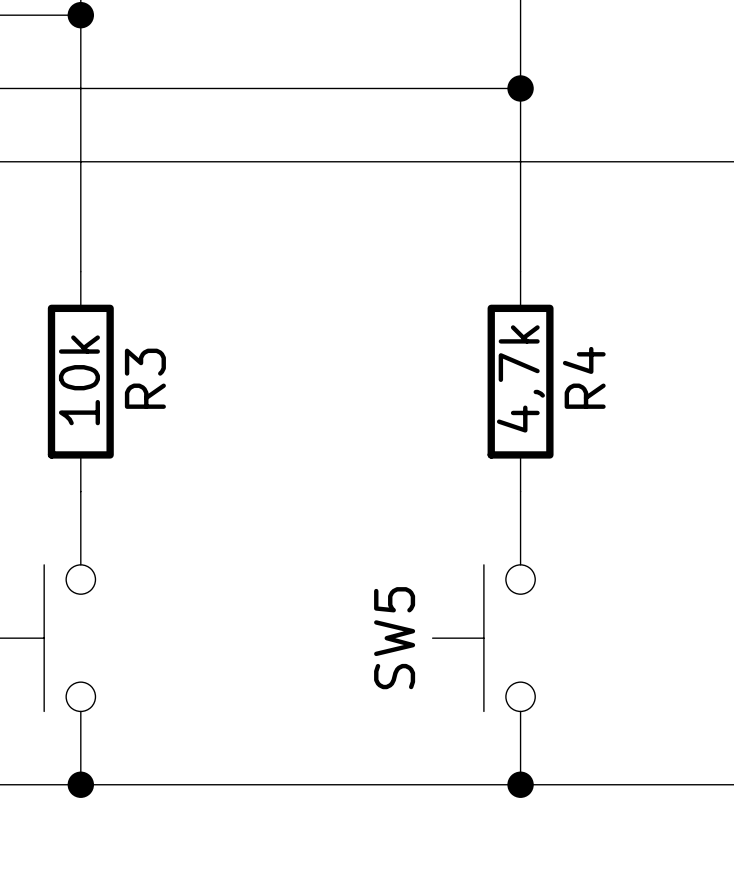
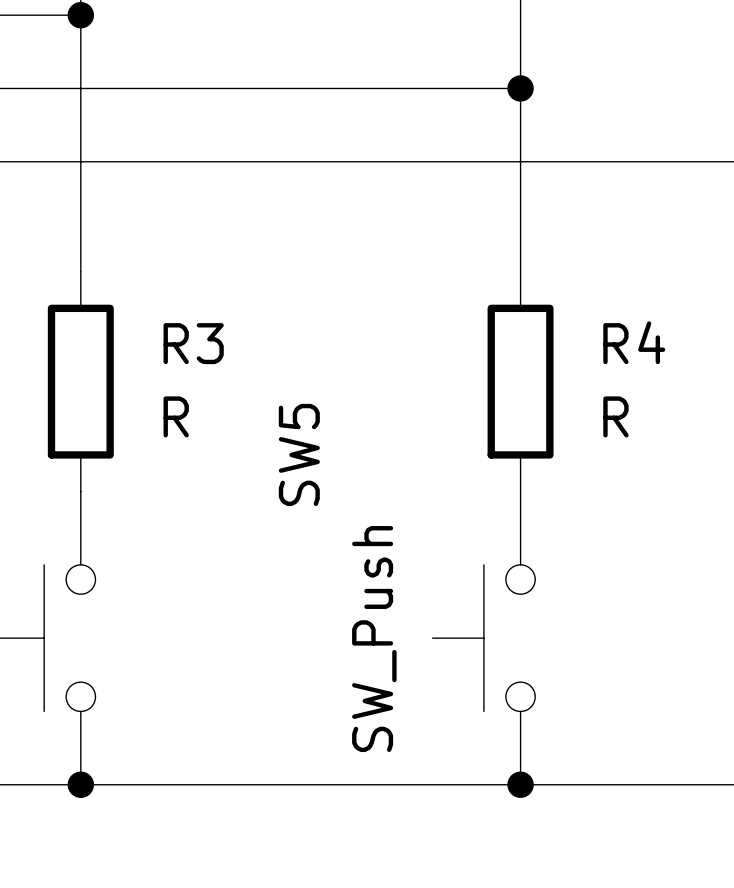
R4 name rotation: 0° (584, 377) -> 90° clockwise (634, 342)
R3 name rotation: 0° (145, 378) -> 90° clockwise (193, 343)
R4 value: 4,7k (520, 378) -> R (615, 416)
R3 value: 10k (79, 380) -> R (176, 416)
SW5 name position: SW5 (394, 638) -> SW5 (299, 454)
SW5 value: none -> SW_Push (374, 639)

